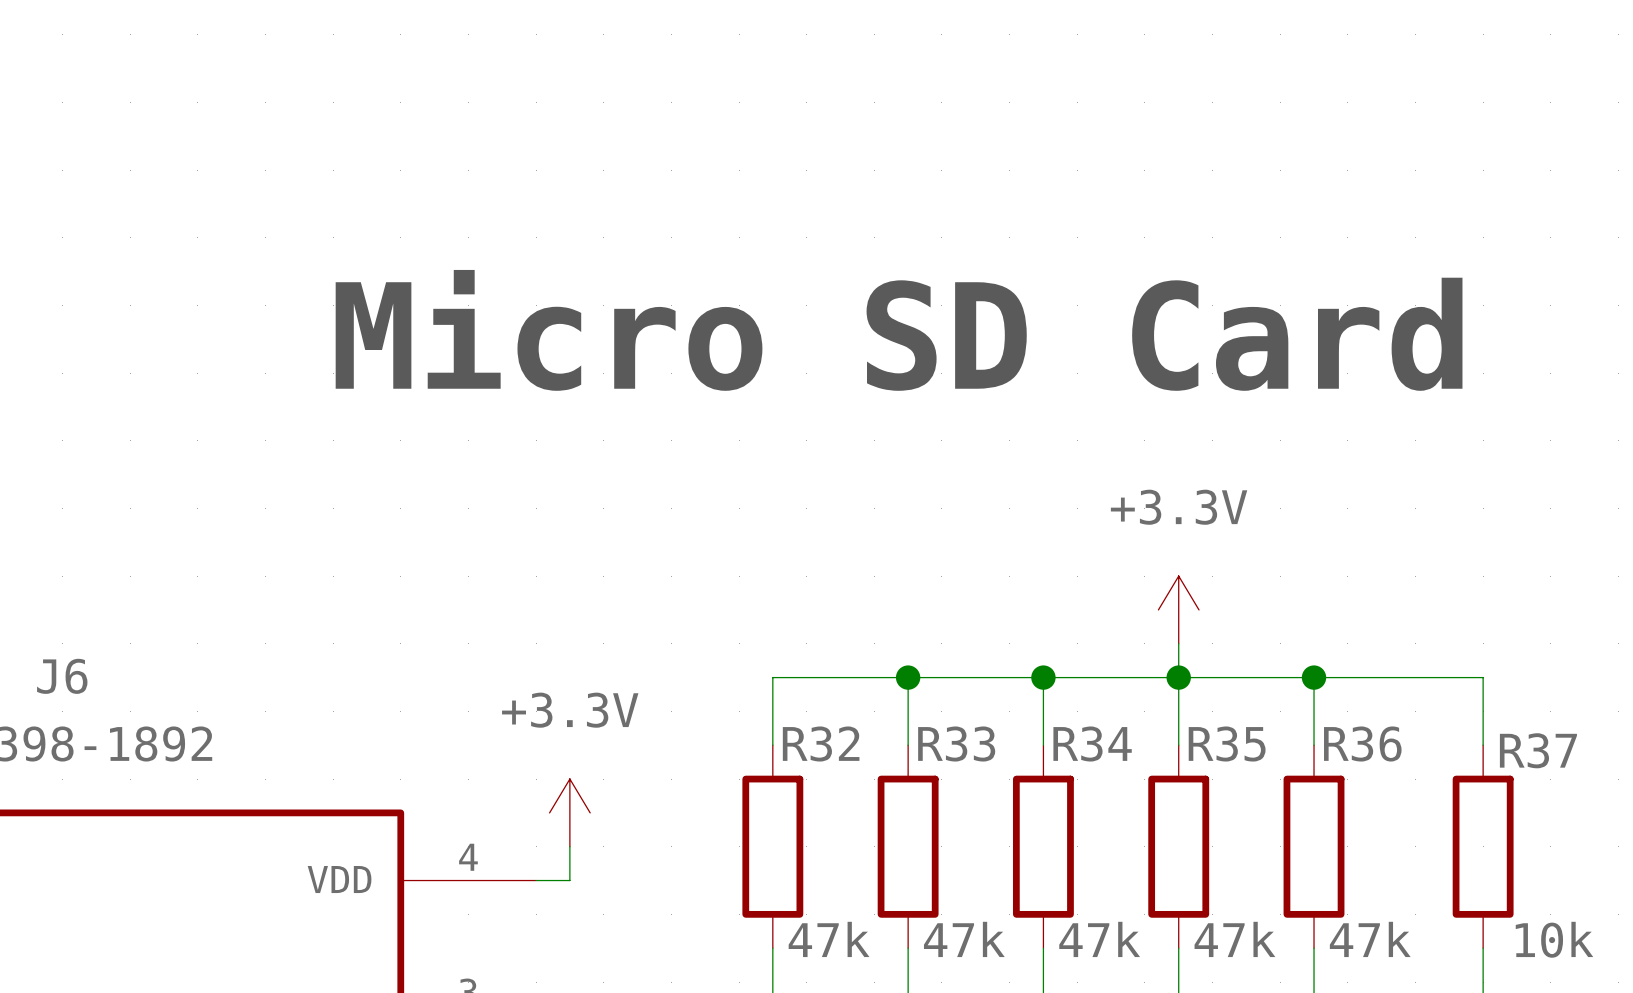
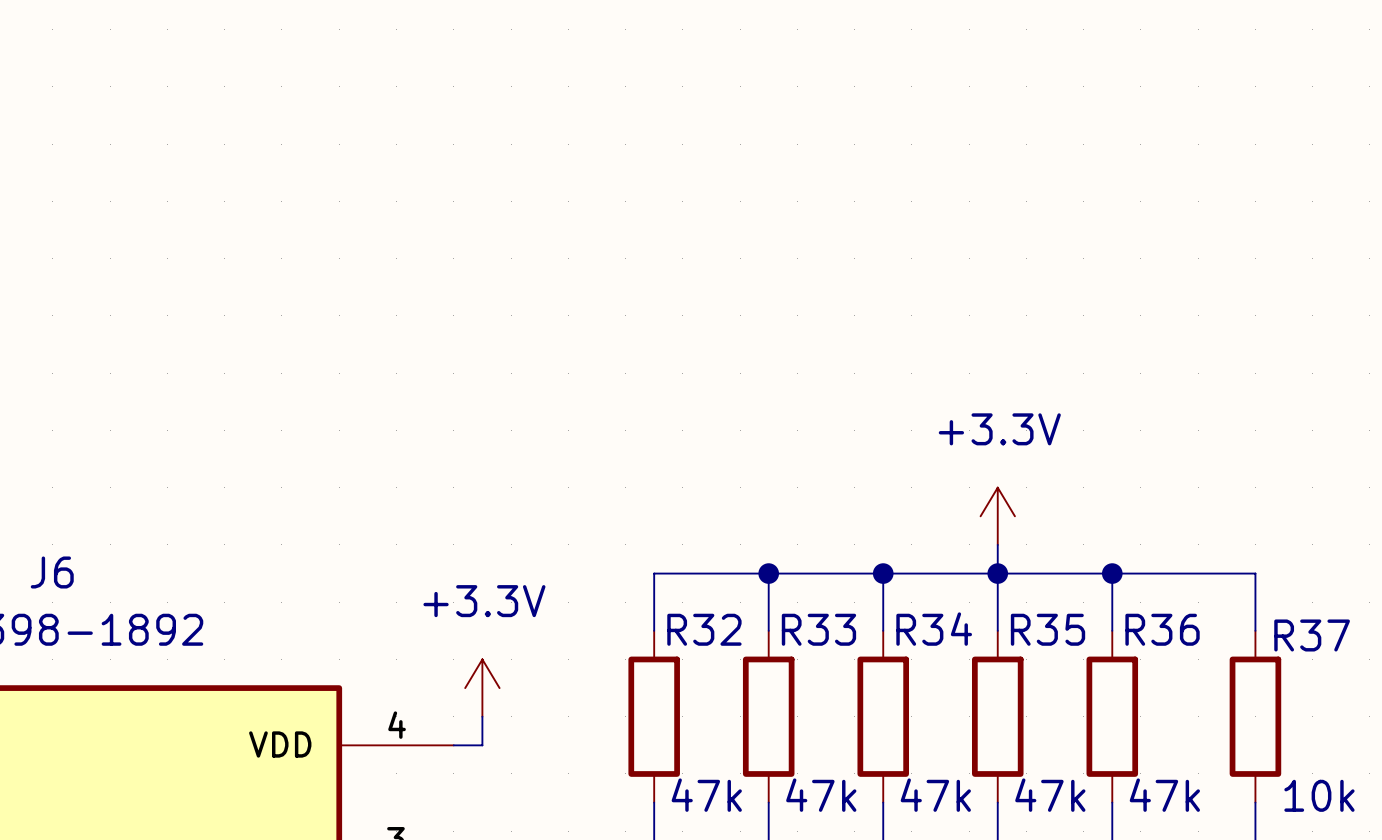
text: Micro SD Card (899, 330) -> none

